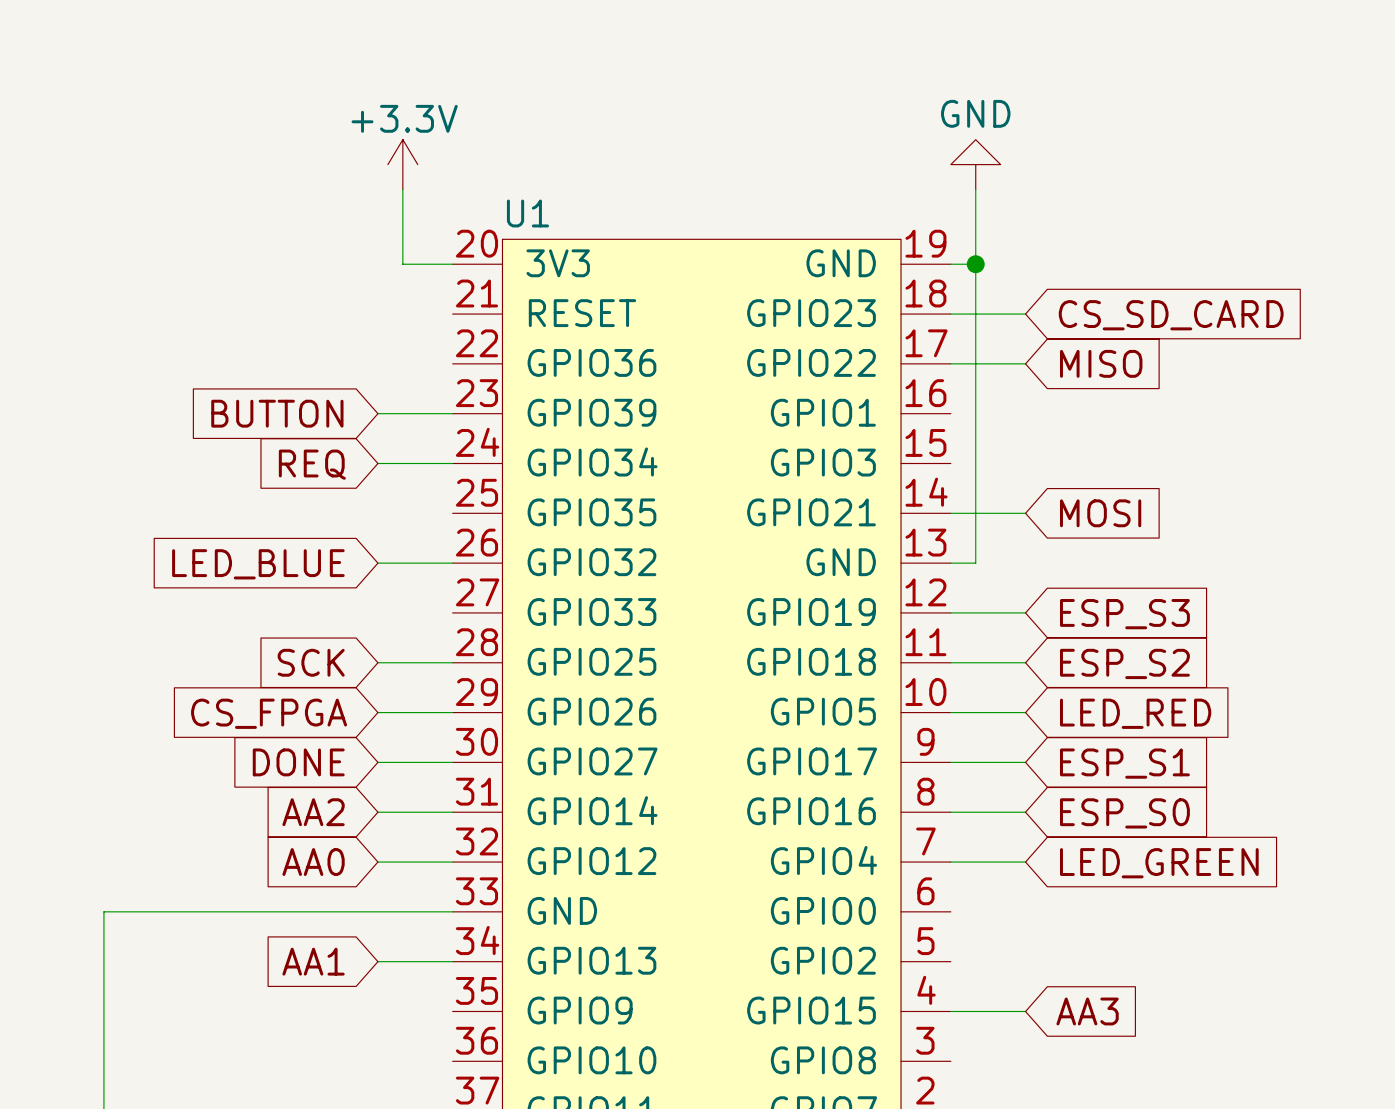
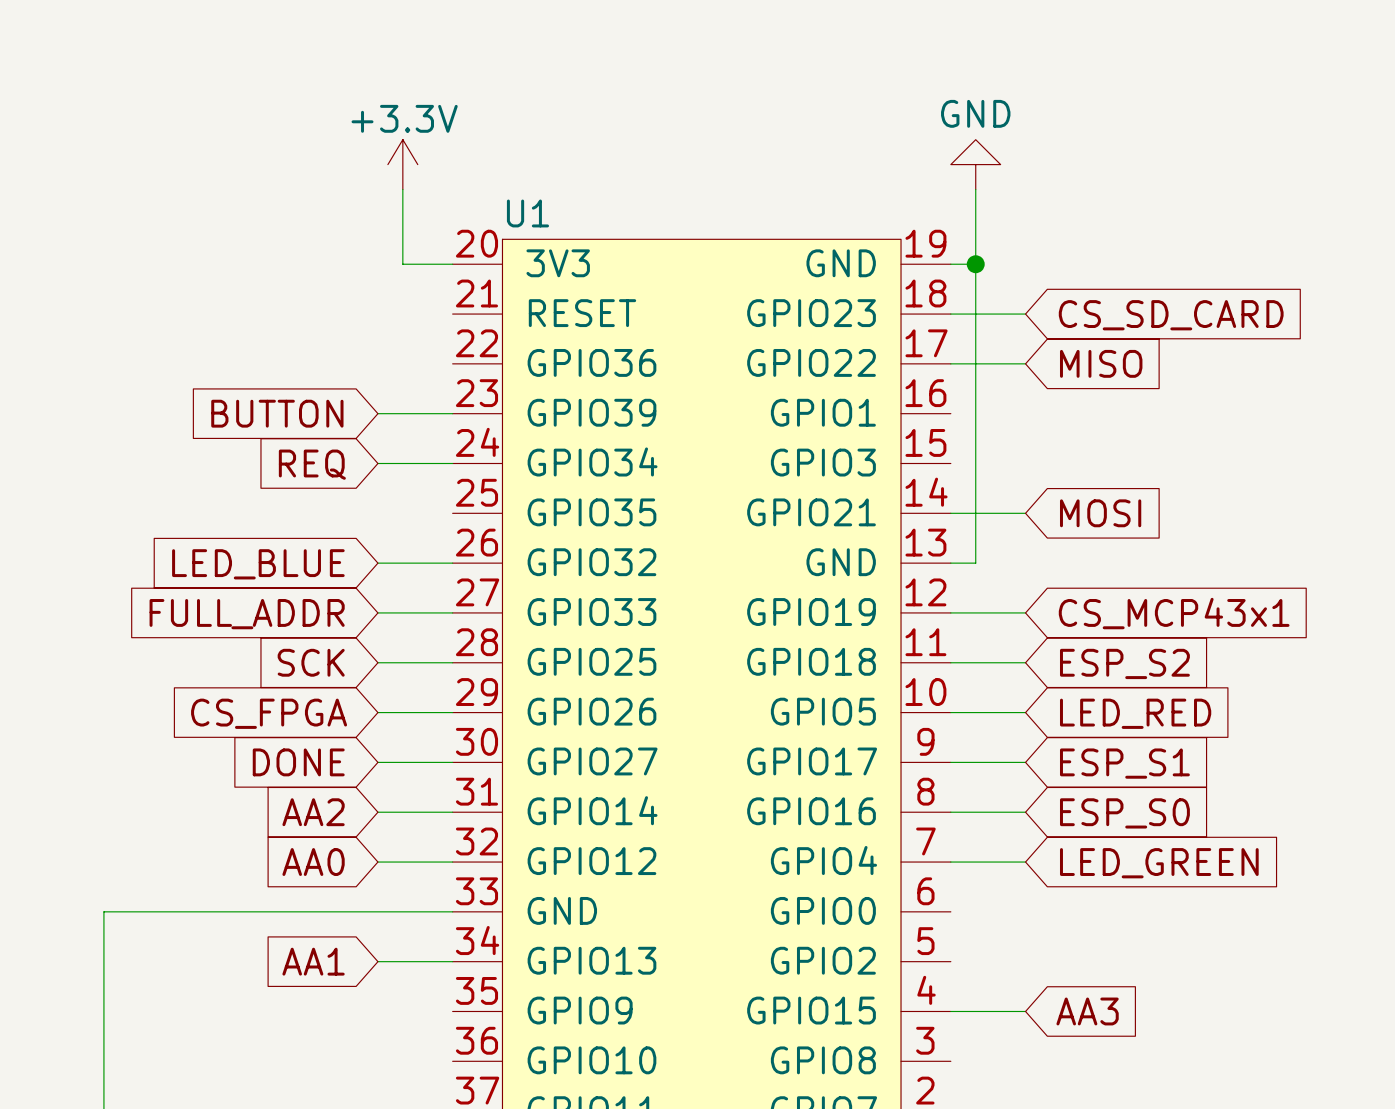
wire: none -> (377, 612) (452, 612)
global label: none -> FULL_ADDR (247, 614)
global label: ESP_S3 (1124, 614) -> CS_MCP43x1 (1174, 613)

